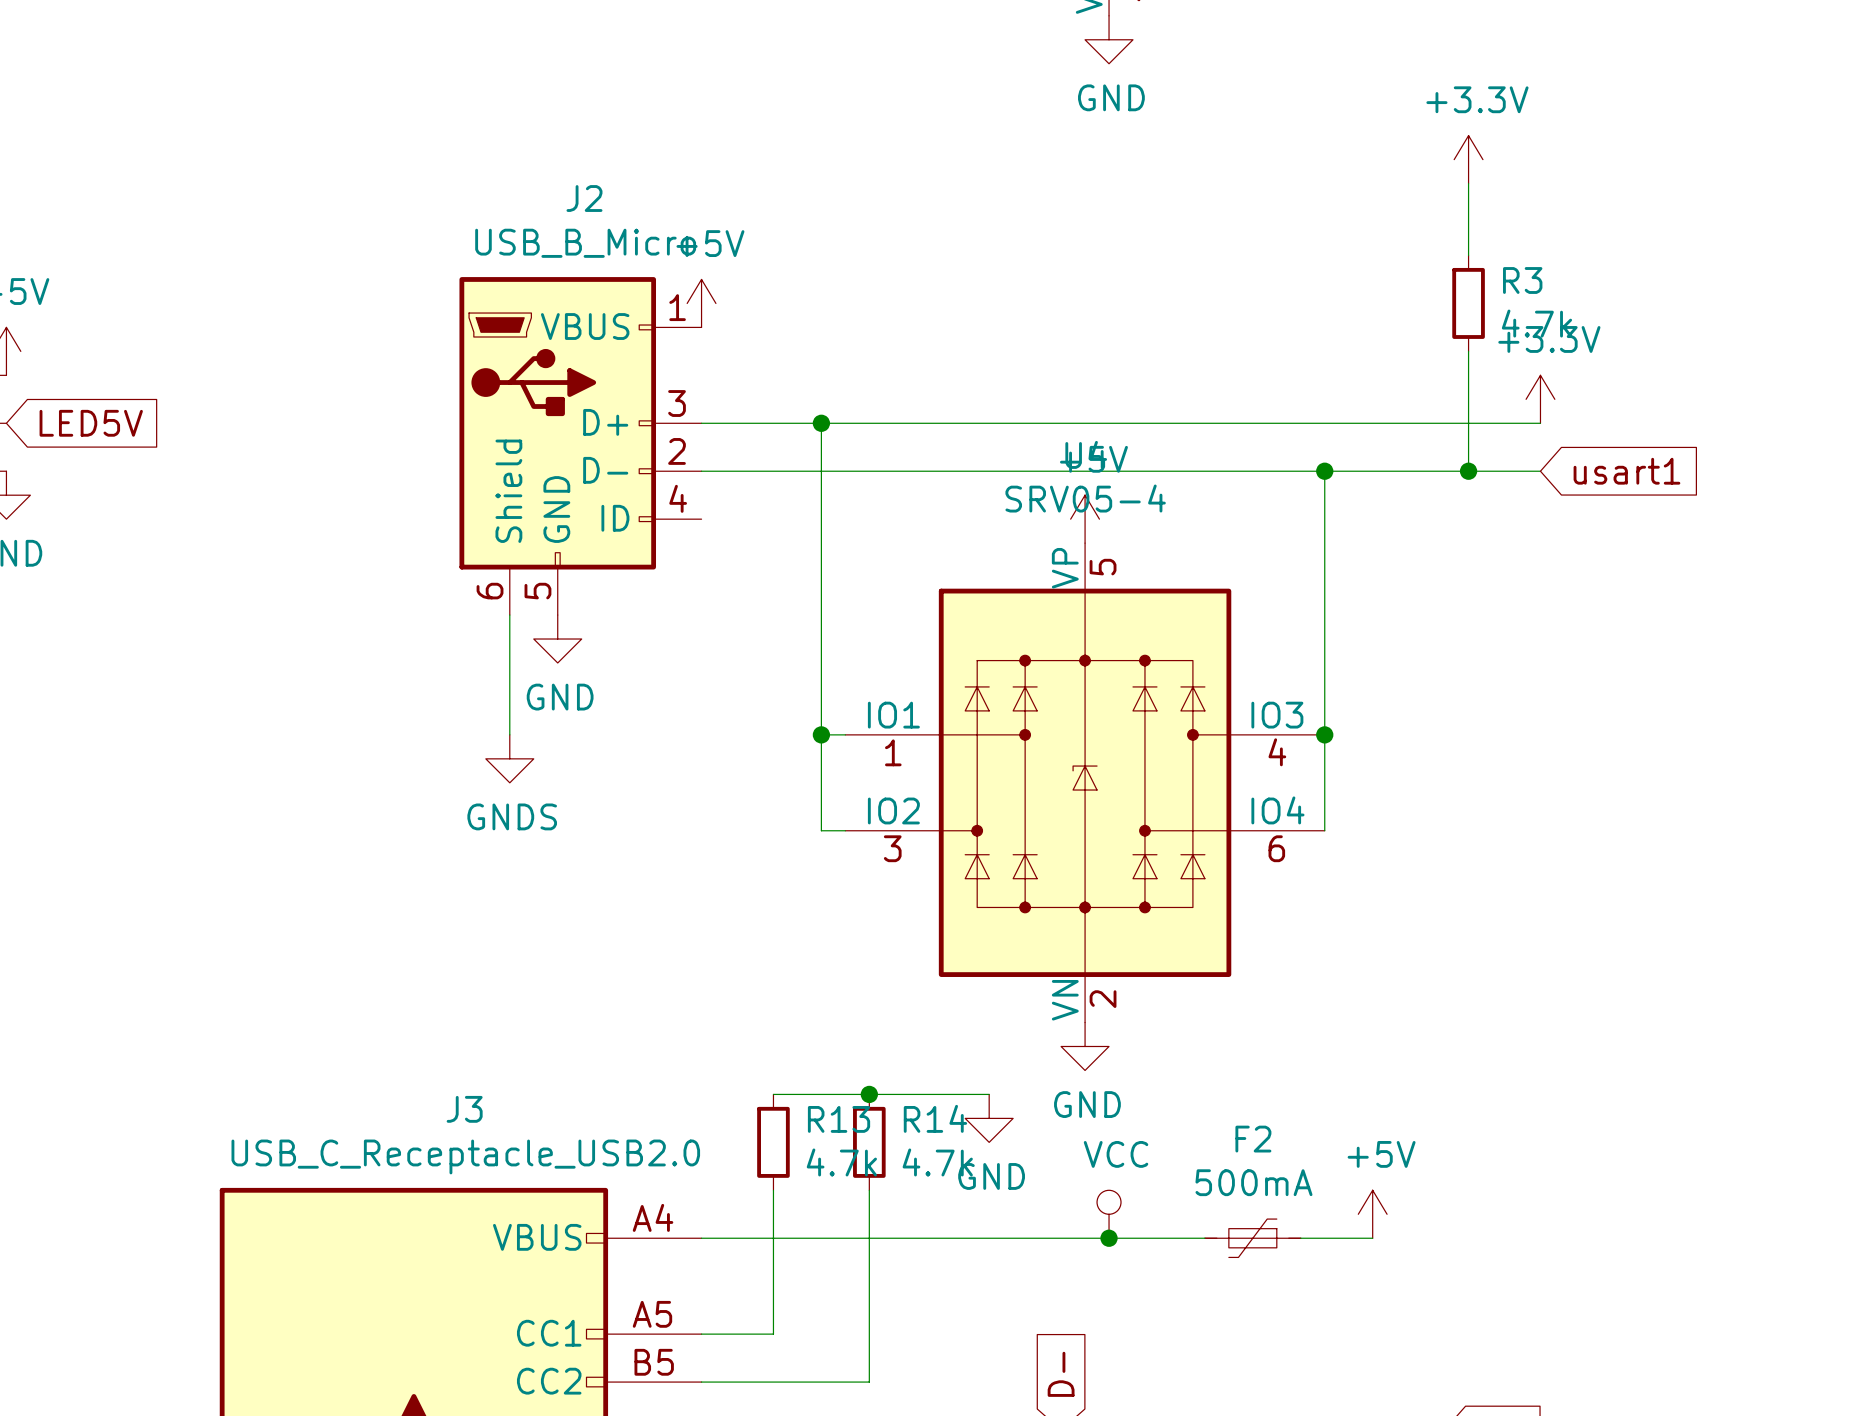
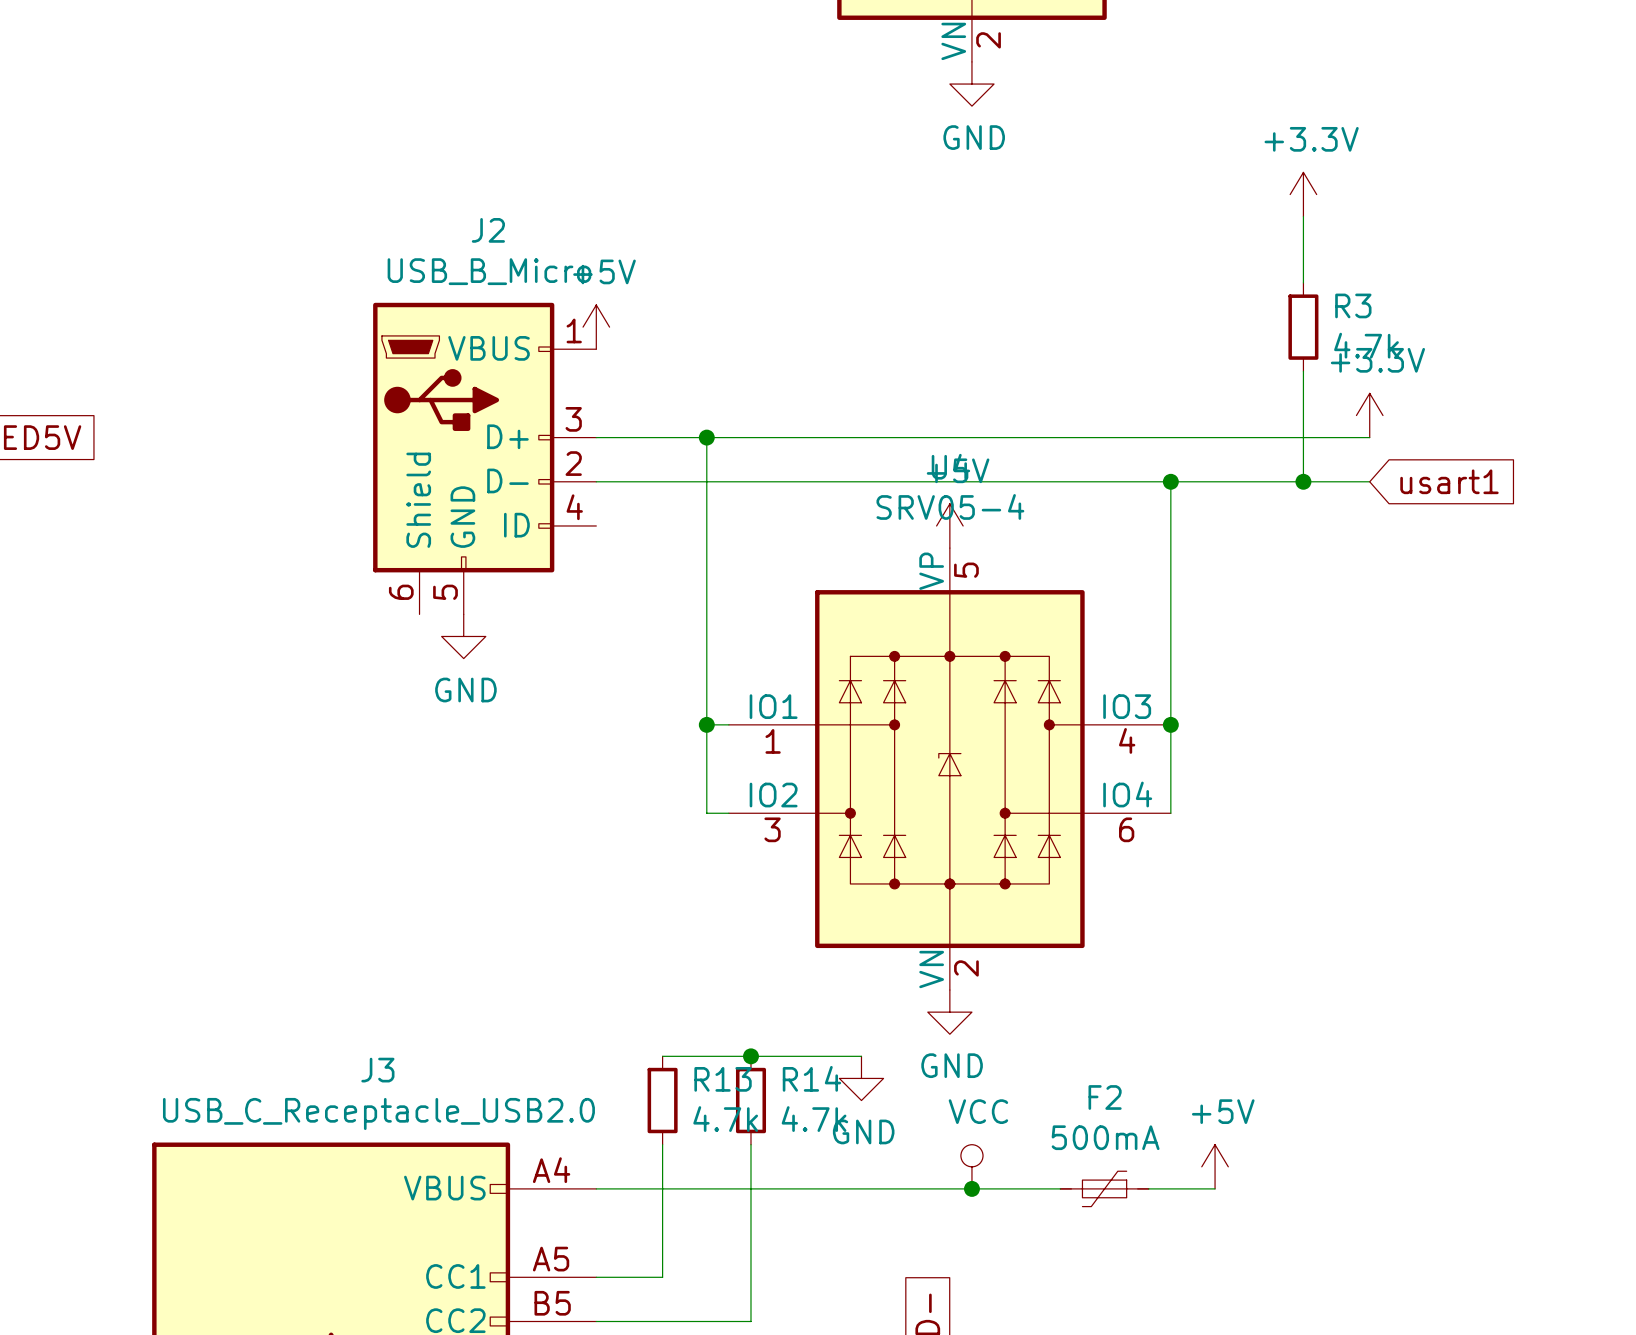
wire: (509, 615) (509, 734) -> none
power symbol: GNDS (509, 758) -> none

